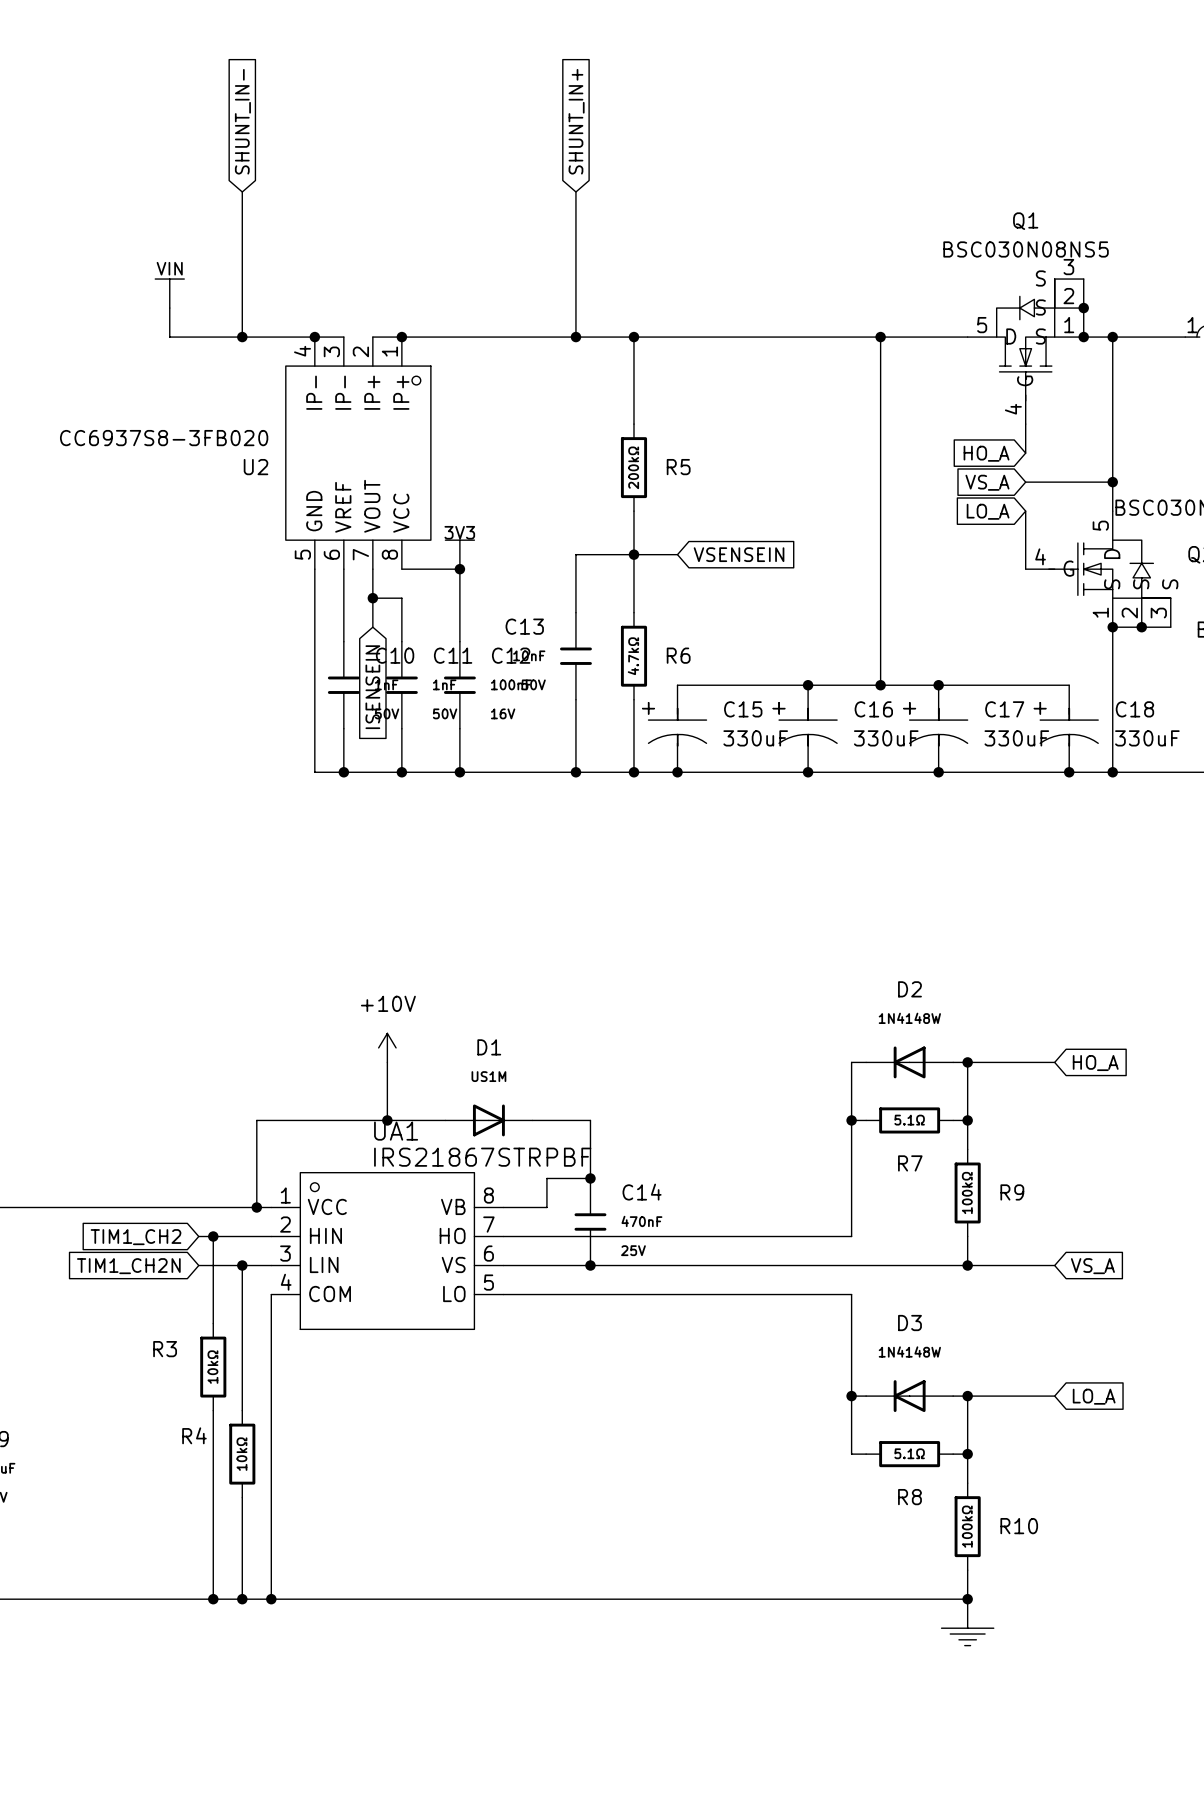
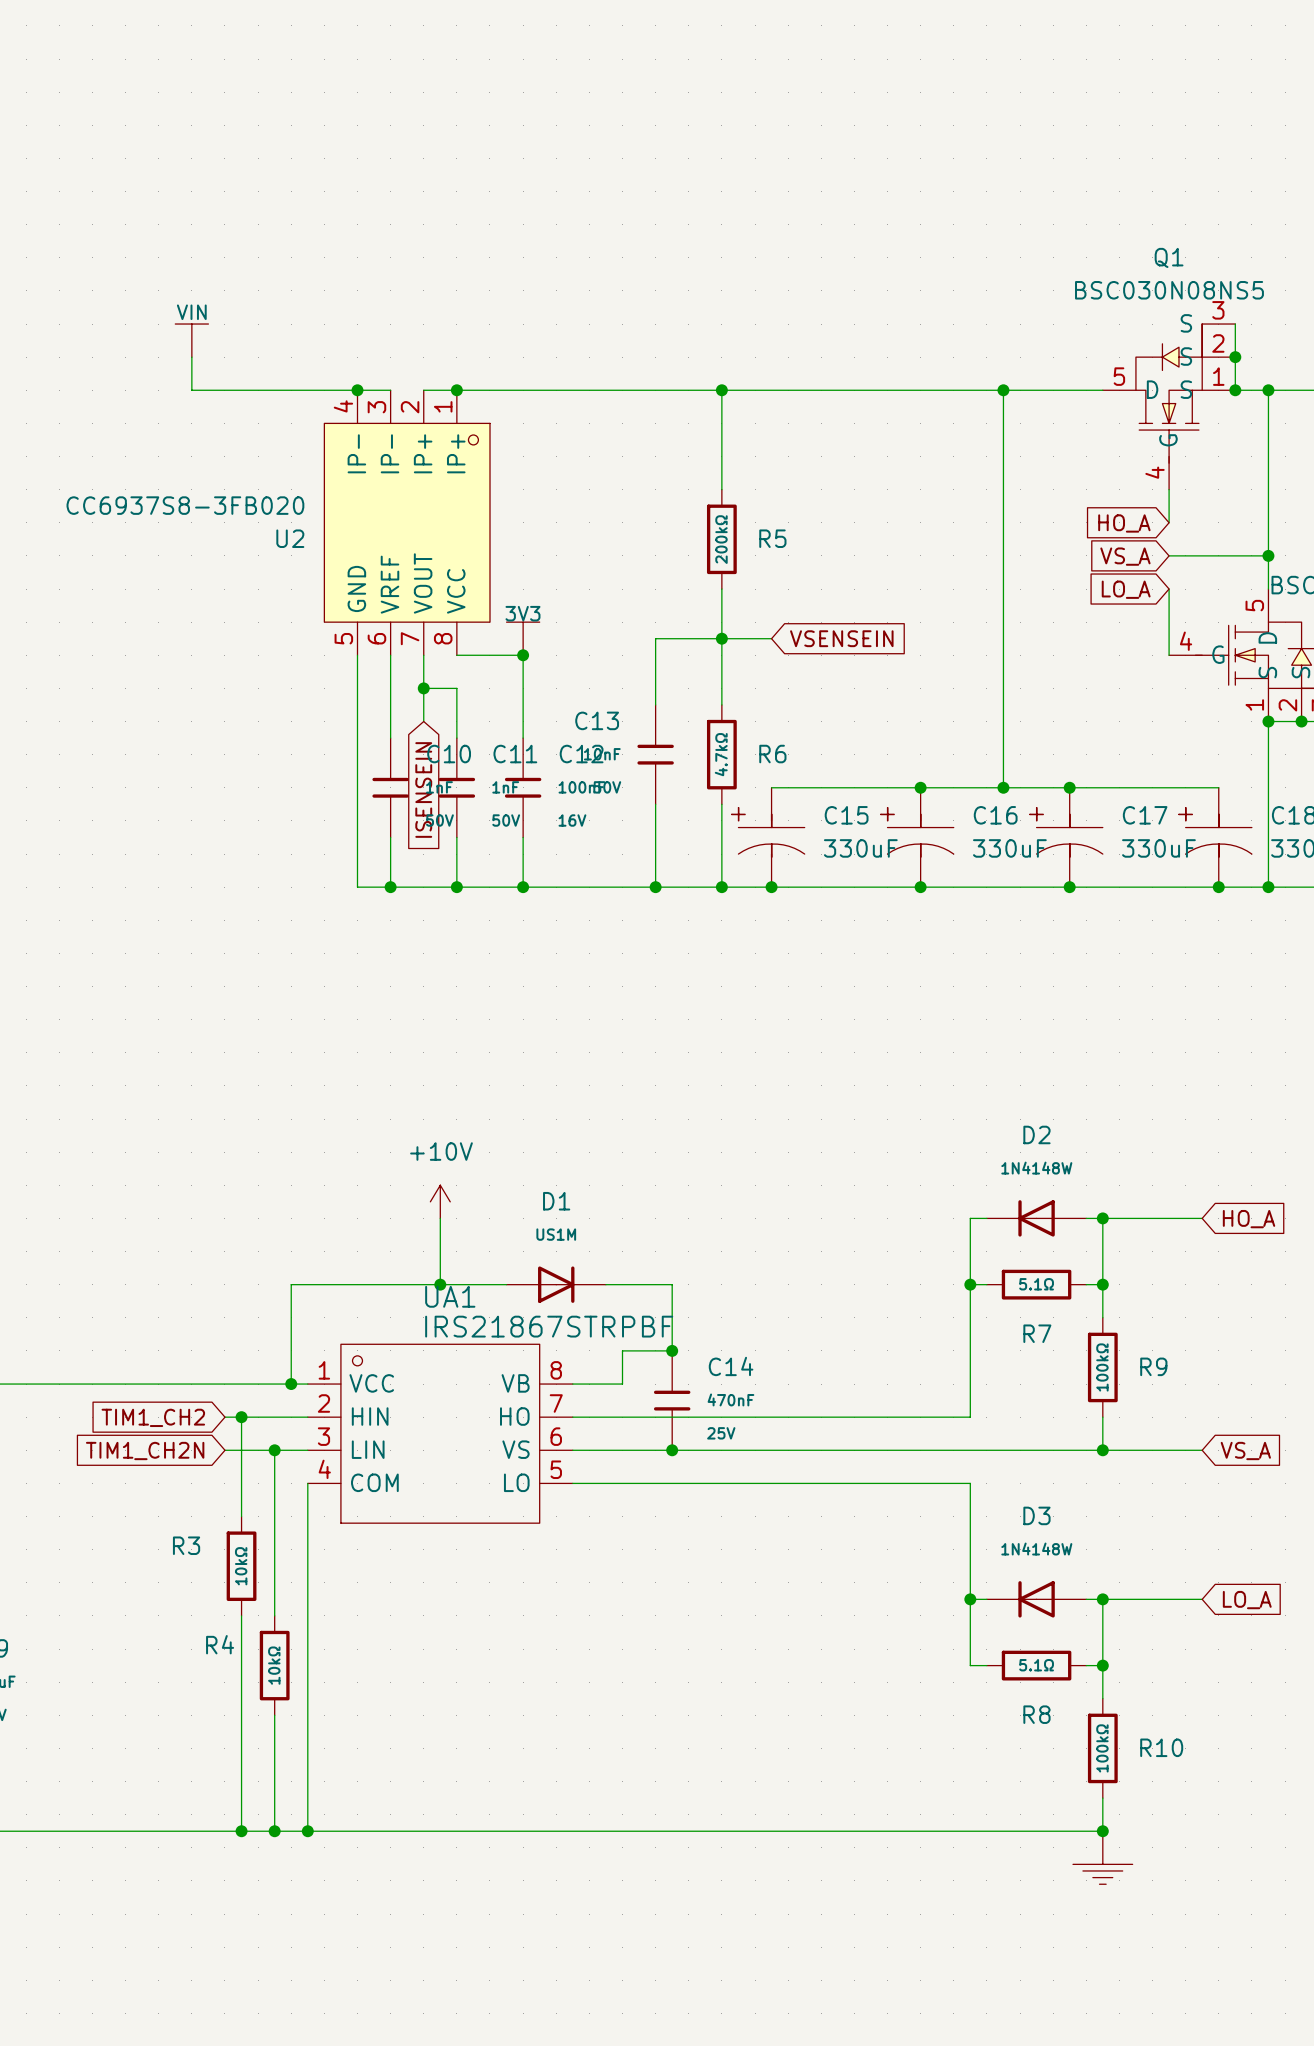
global label: SHUNT_IN- (242, 121) -> none
global label: SHUNT_IN+ (576, 121) -> none
wire: (242, 191) (242, 337) -> none
wire: (575, 191) (575, 337) -> none
junction: (242, 337) -> none
junction: (575, 337) -> none

